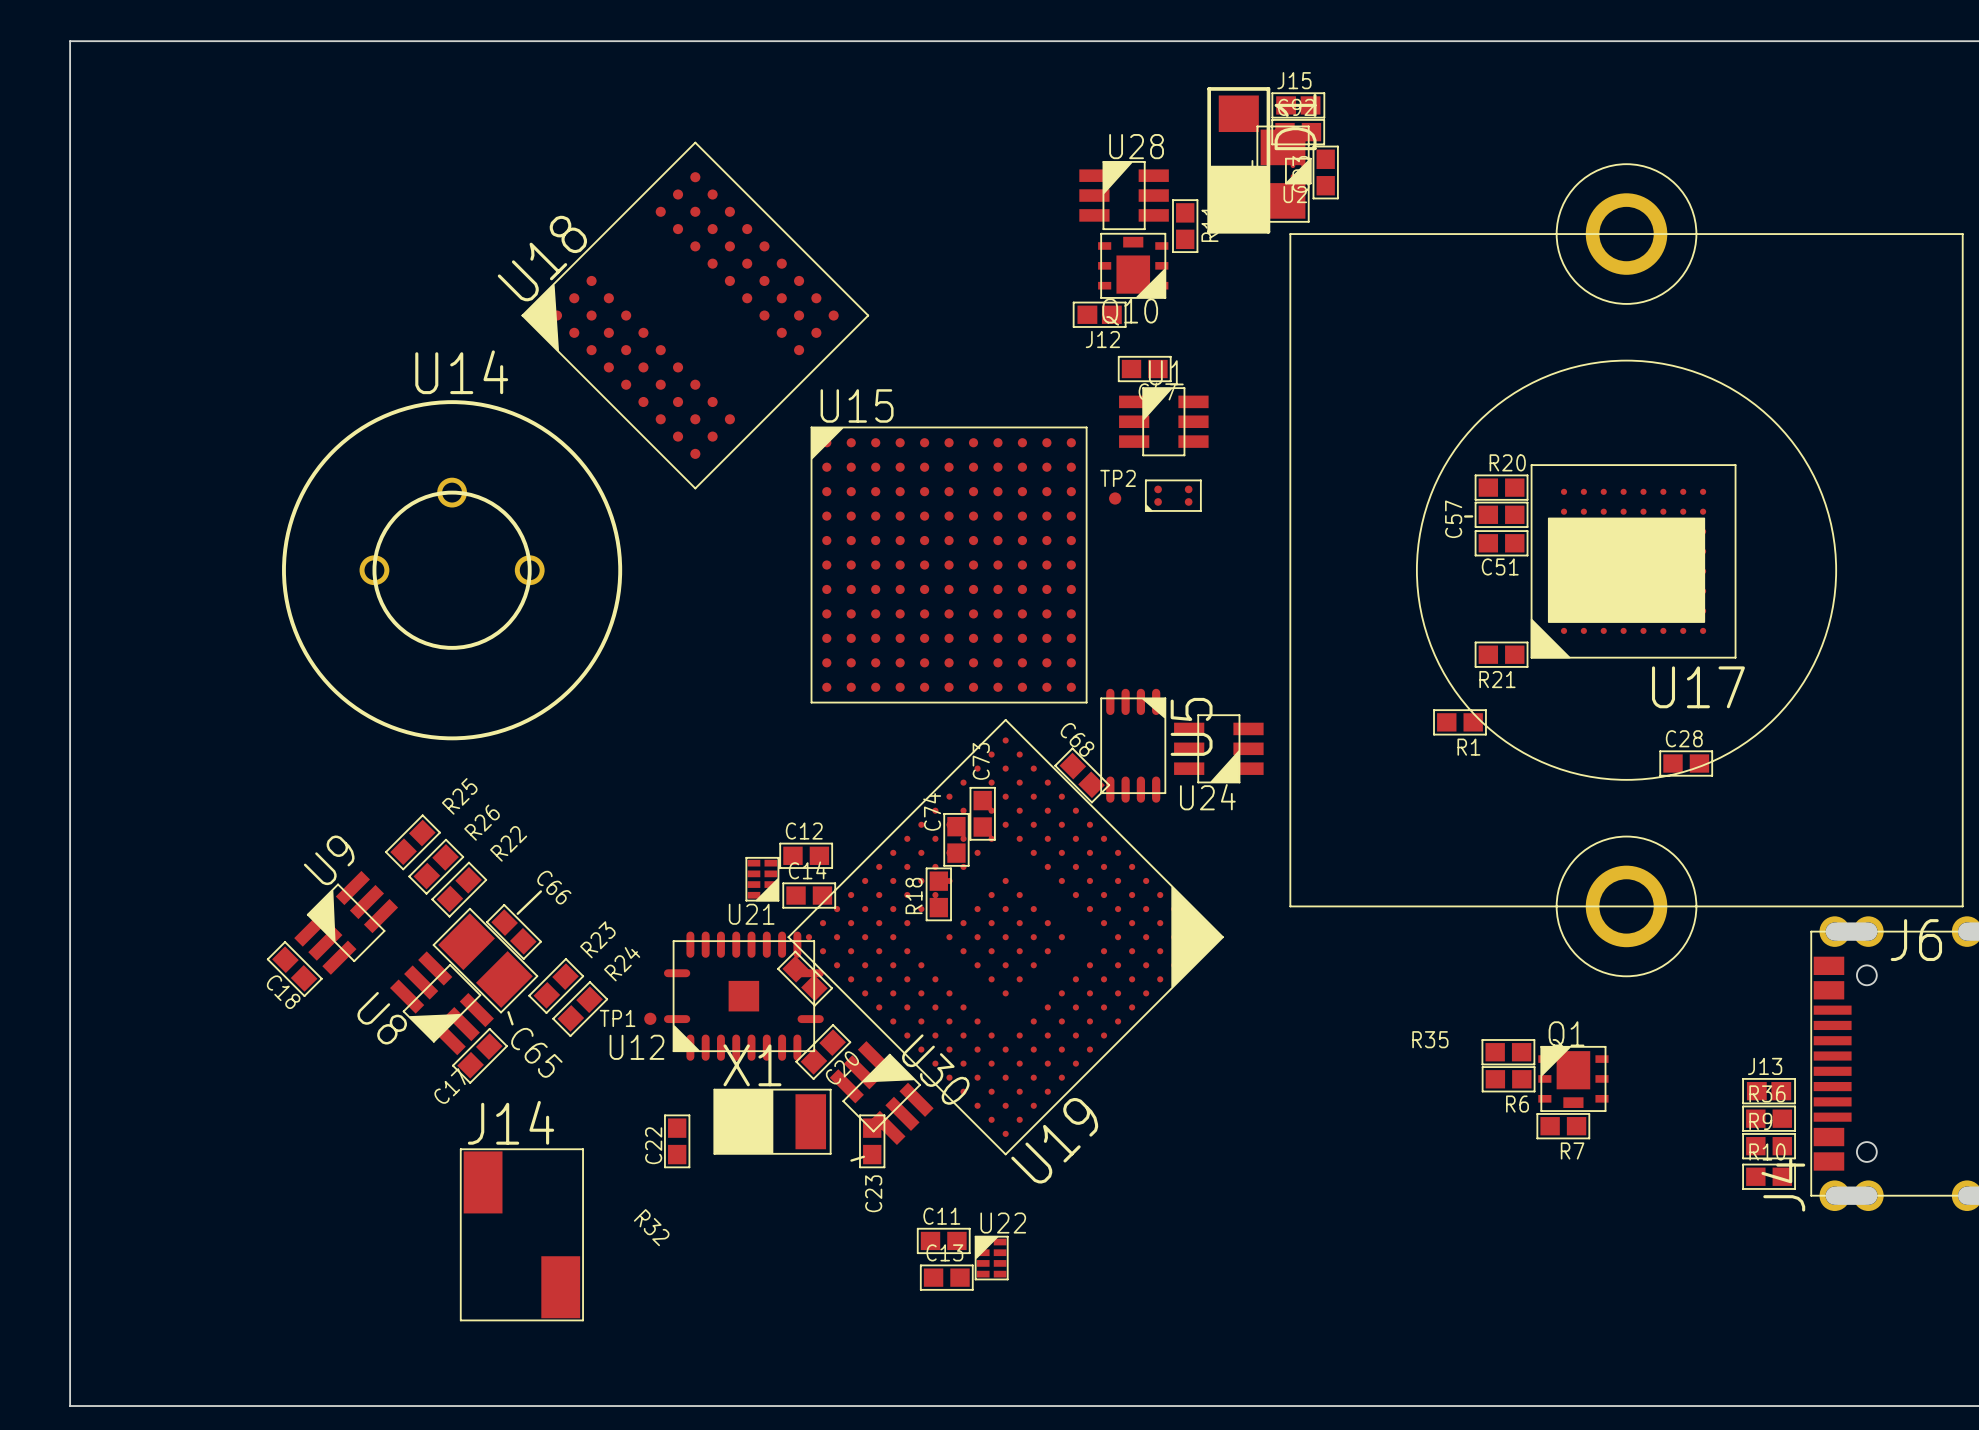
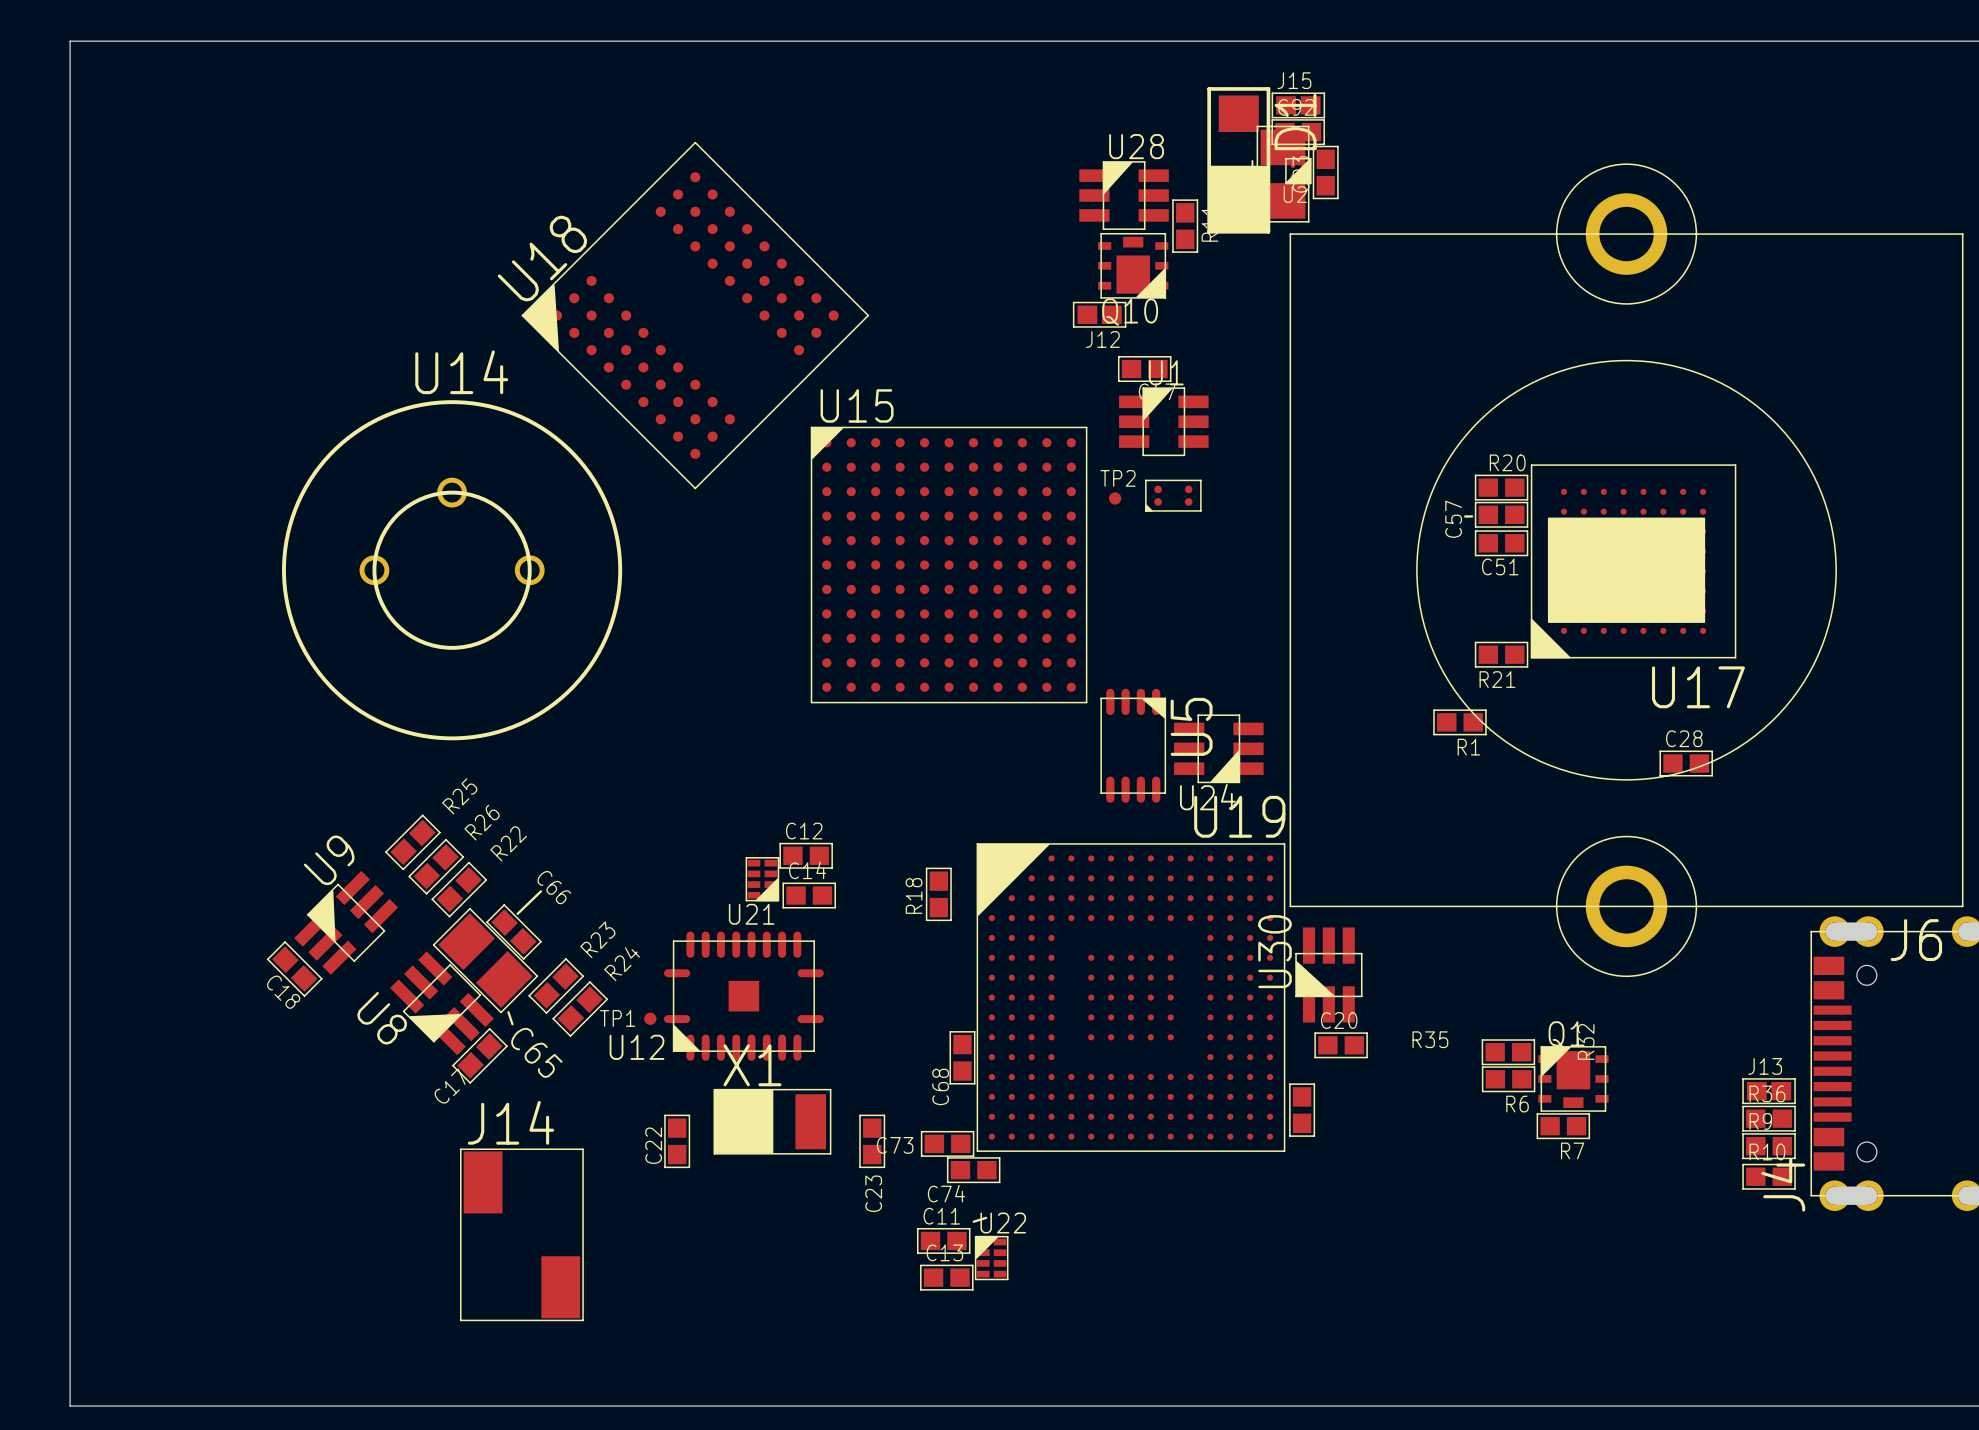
C68 name position: C68 (1077, 739) -> C68 (940, 1086)
C73 name position: C73 (981, 761) -> C73 (895, 1145)
C68 rotation: 0° (1082, 775) -> 45° clockwise (962, 1057)
C68 position: (1082, 775) -> (962, 1057)
C73 rotation: 0° (982, 813) -> 90° clockwise (947, 1143)
C73 position: (982, 813) -> (947, 1143)
C74 rotation: 0° (956, 839) -> 90° clockwise (973, 1170)
C74 position: (956, 839) -> (973, 1170)
U19 rotation: 0° (1005, 937) -> 135° counterclockwise (1130, 997)
R32 rotation: 0° (805, 978) -> 45° clockwise (1302, 1110)
R32 position: (805, 978) -> (1302, 1110)
C20 rotation: 0° (823, 1051) -> 45° clockwise (1341, 1045)
C20 position: (823, 1051) -> (1341, 1045)
U30 rotation: 0° (881, 1093) -> 135° counterclockwise (1328, 975)
U30 position: (881, 1093) -> (1328, 975)
line: (863, 1156) (851, 1160) -> (986, 1217) (973, 1221)
R32 name position: R32 (651, 1227) -> R32 (1586, 1041)

